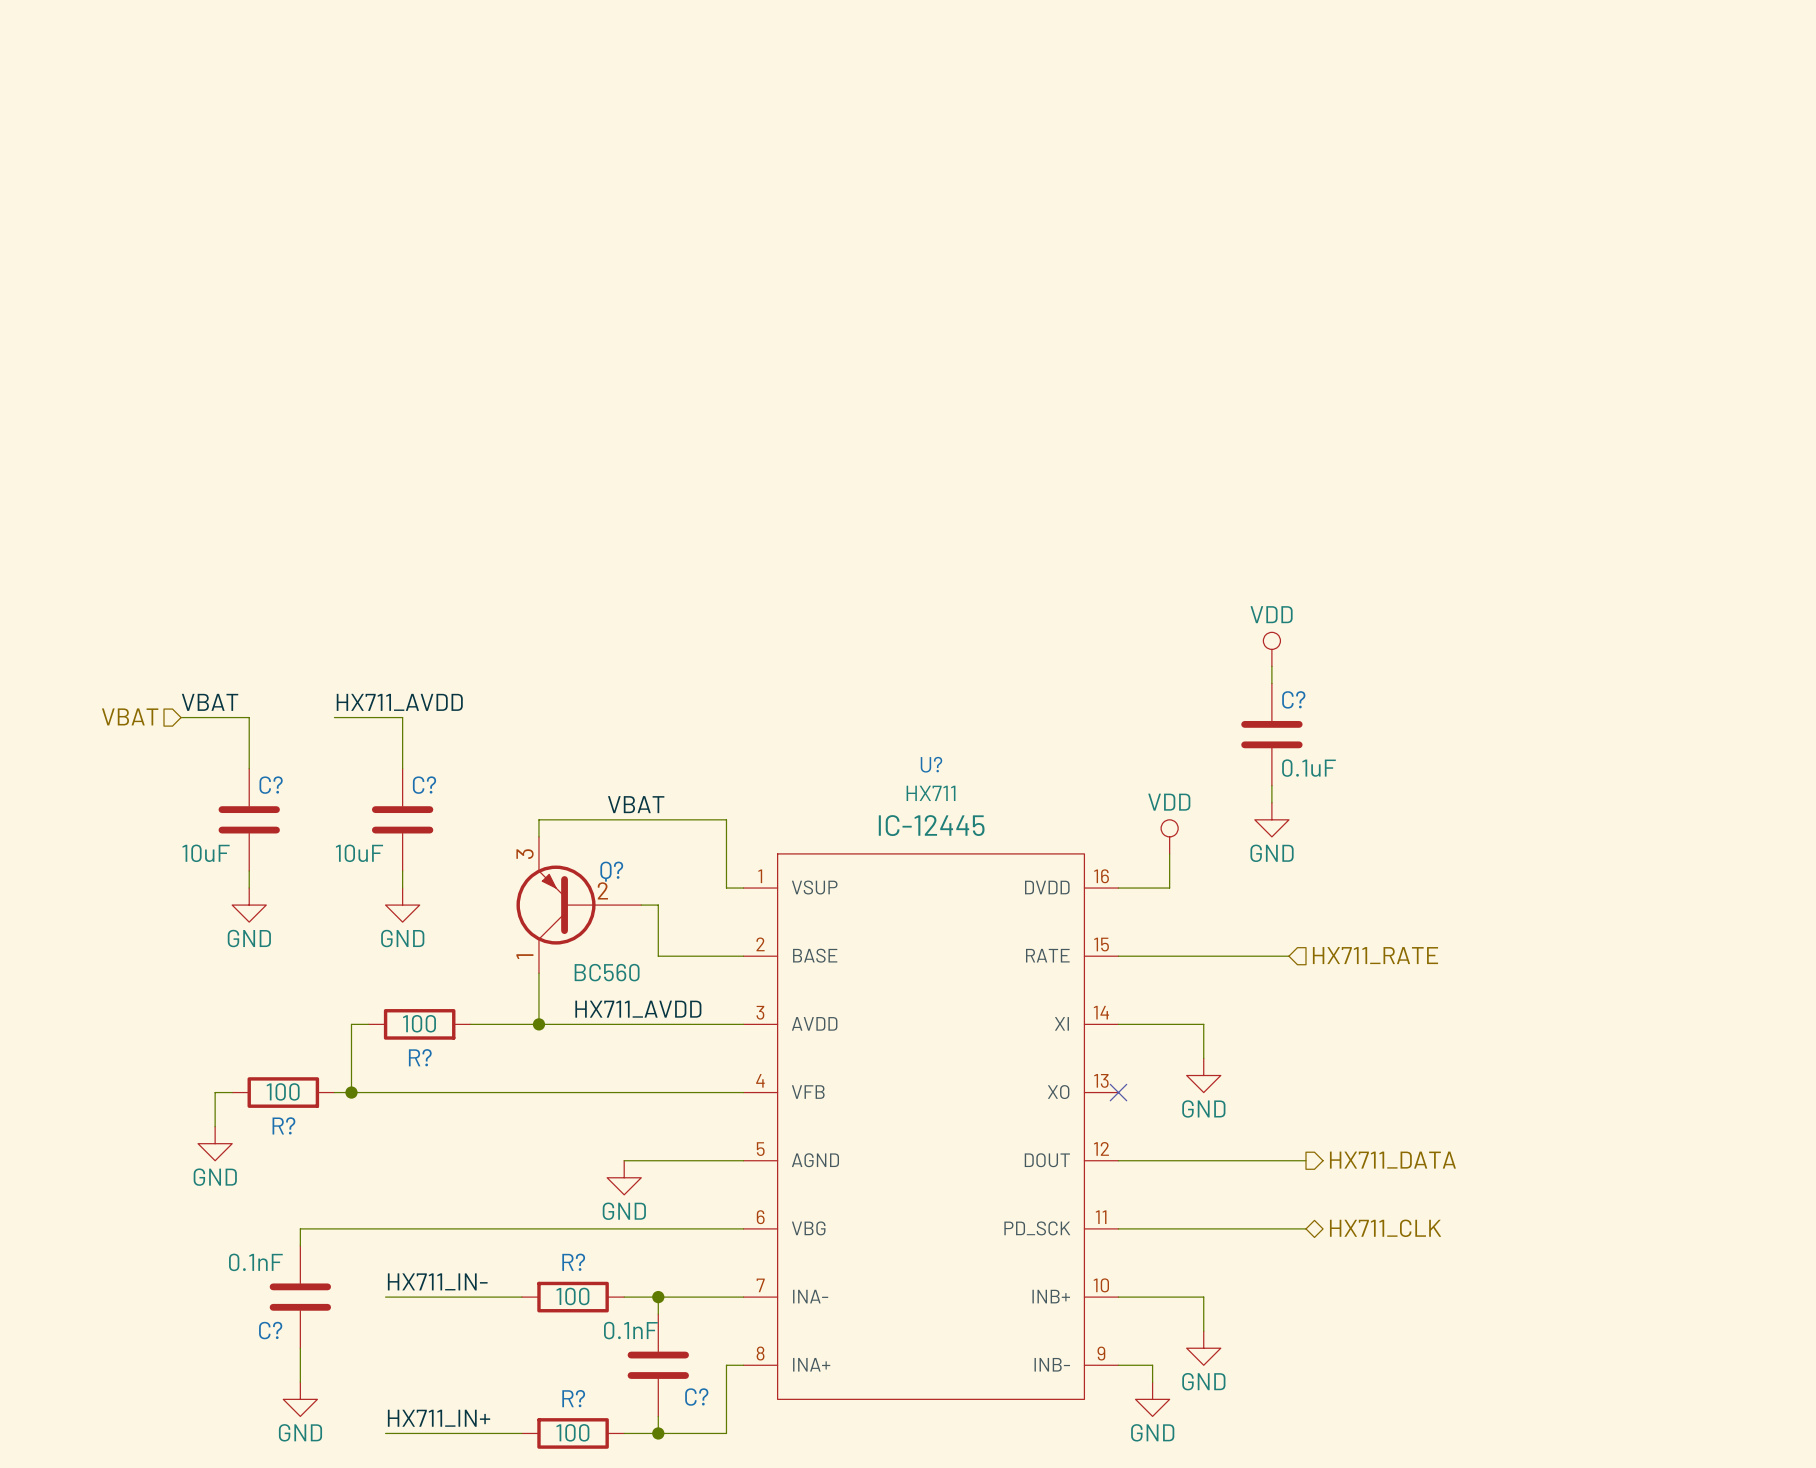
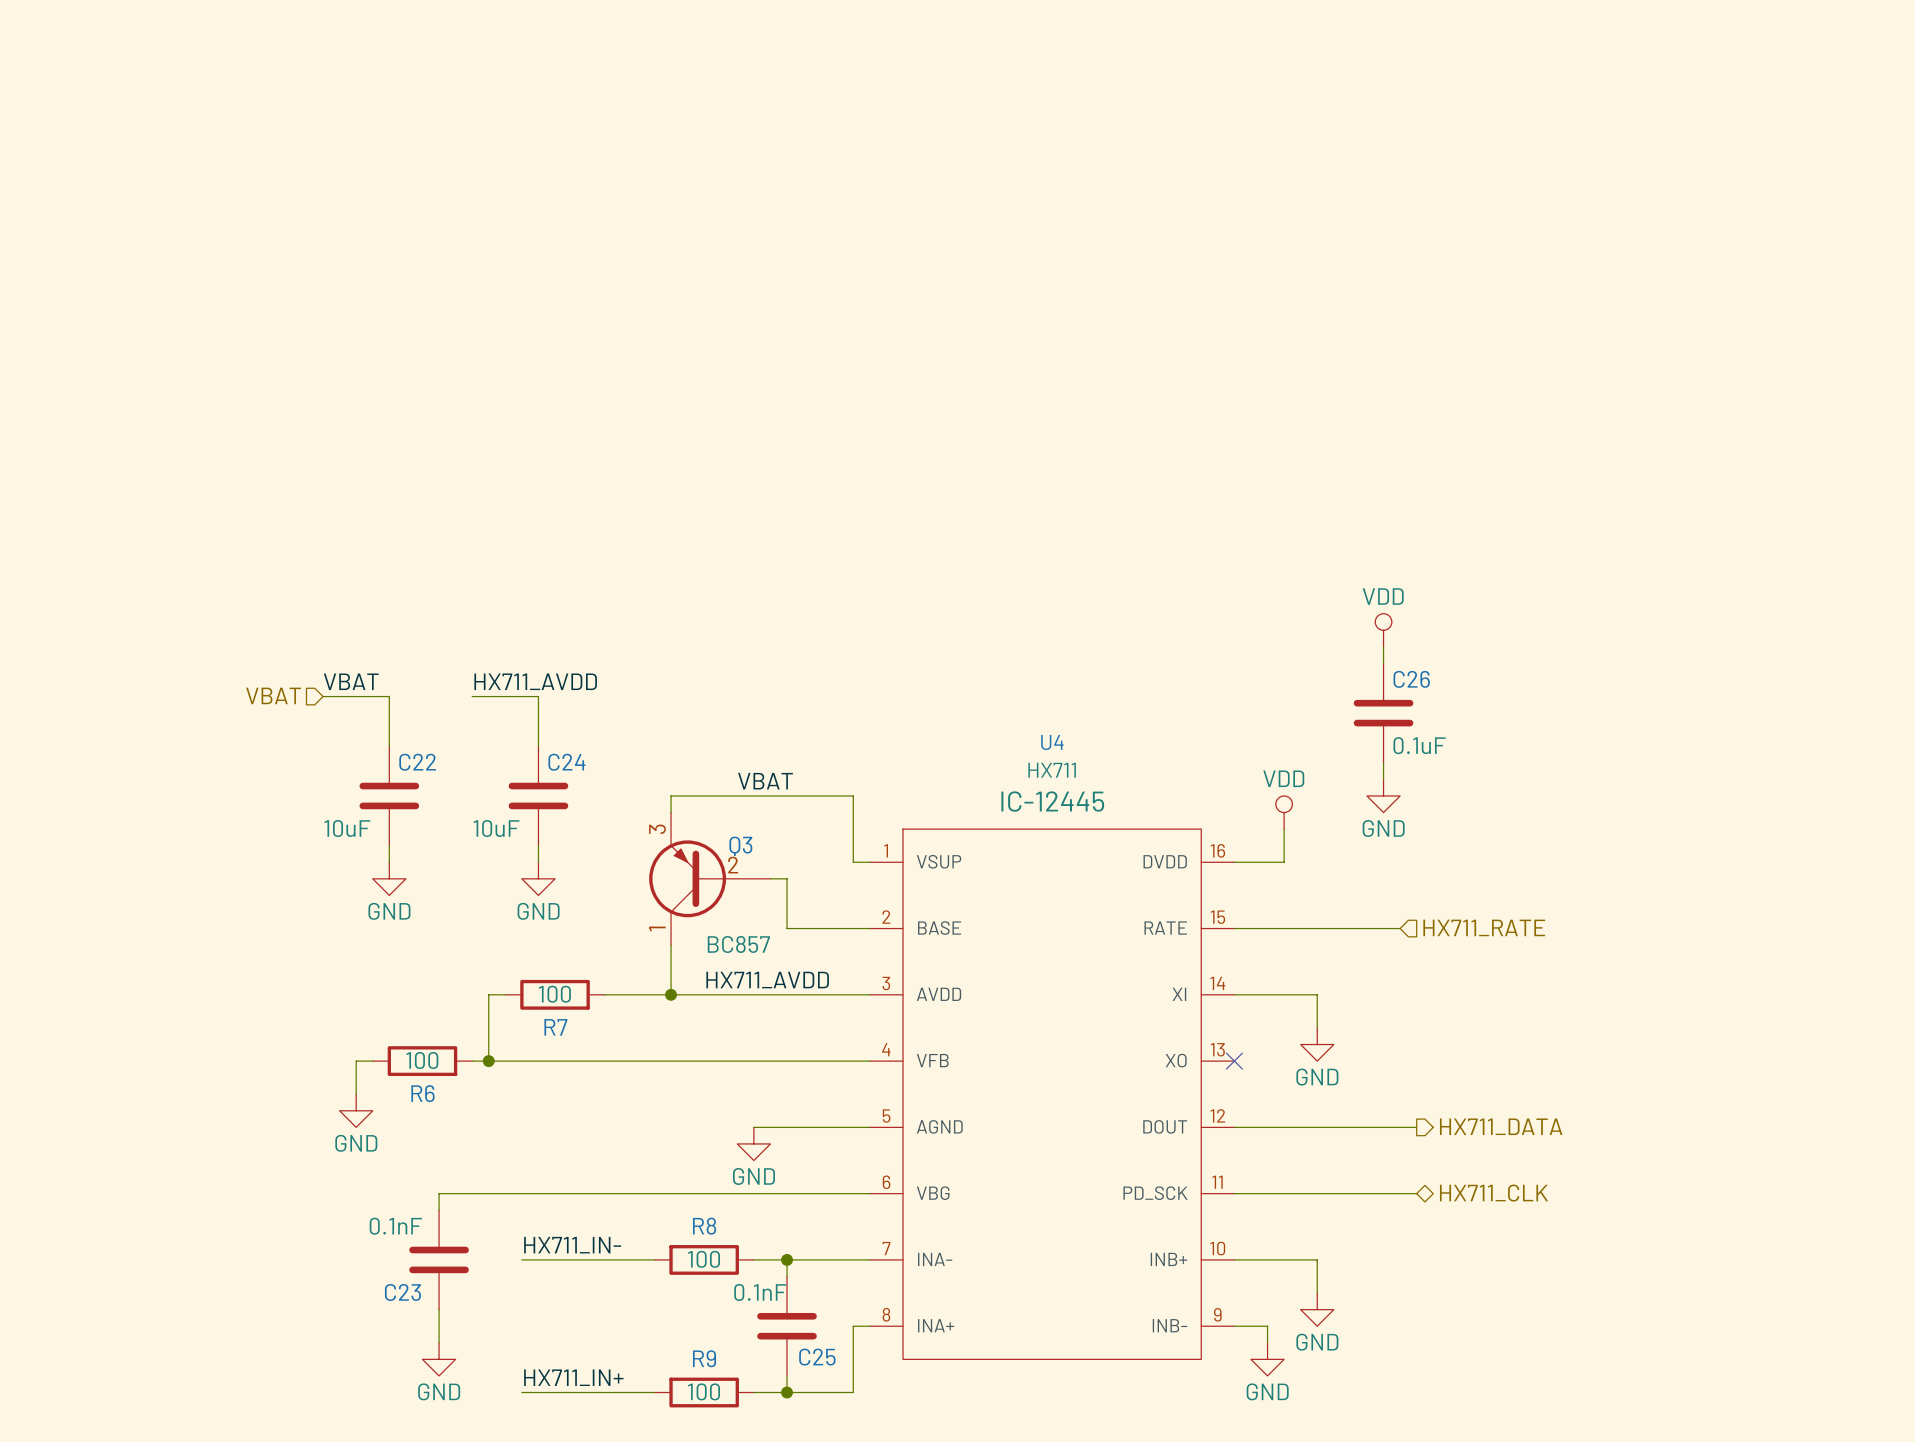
C? name: C? (1293, 699) -> C26 (1411, 679)
U? name: U? (931, 764) -> U4 (1052, 742)
C? name: C? (271, 785) -> C22 (417, 762)
C? name: C? (424, 785) -> C24 (566, 762)
Q? name: Q? (611, 871) -> Q3 (740, 846)
Q? value: BC560 (607, 972) -> BC857 (738, 944)
R? name: R? (420, 1057) -> R7 (555, 1027)
R? name: R? (283, 1125) -> R6 (422, 1093)
R? name: R? (573, 1262) -> R8 (704, 1226)
C? name: C? (270, 1330) -> C23 (402, 1292)
C? name: C? (696, 1397) -> C25 (817, 1357)
R? name: R? (573, 1398) -> R9 (704, 1358)

